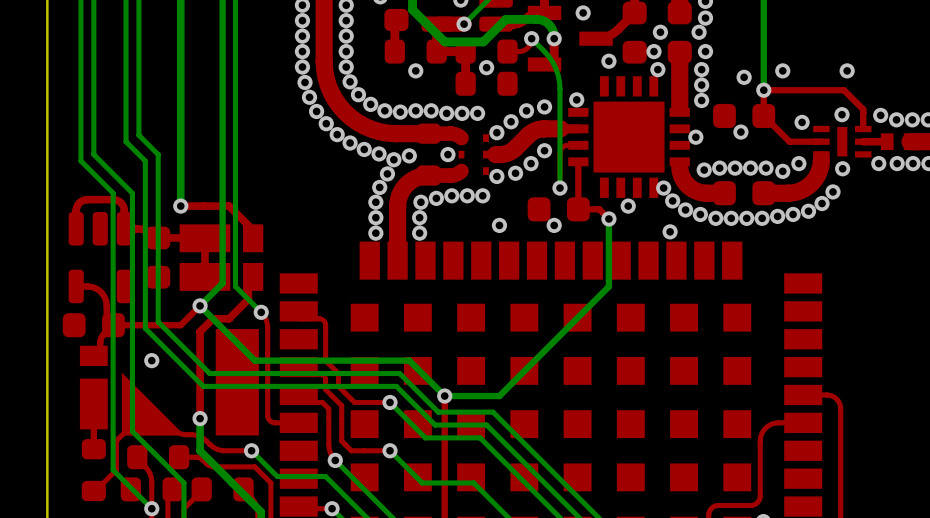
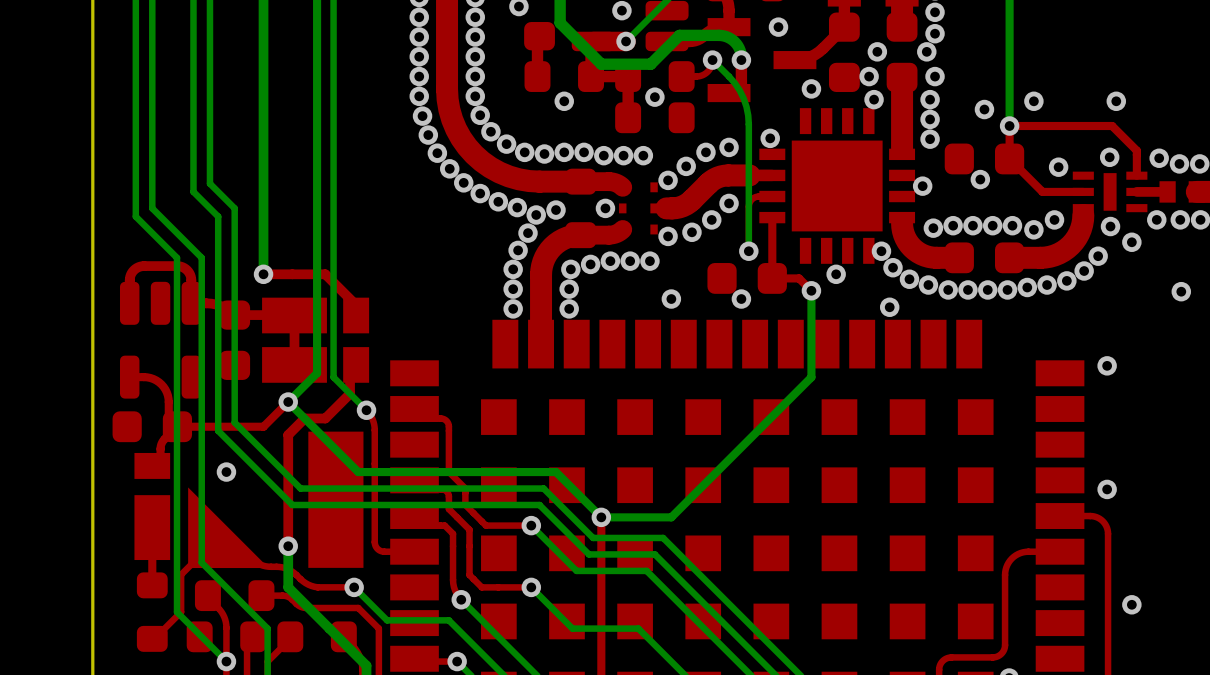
via: none -> (1131, 242)
via: none -> (1181, 291)
via: none -> (1107, 365)
via: none -> (1107, 489)
via: none -> (1131, 604)

